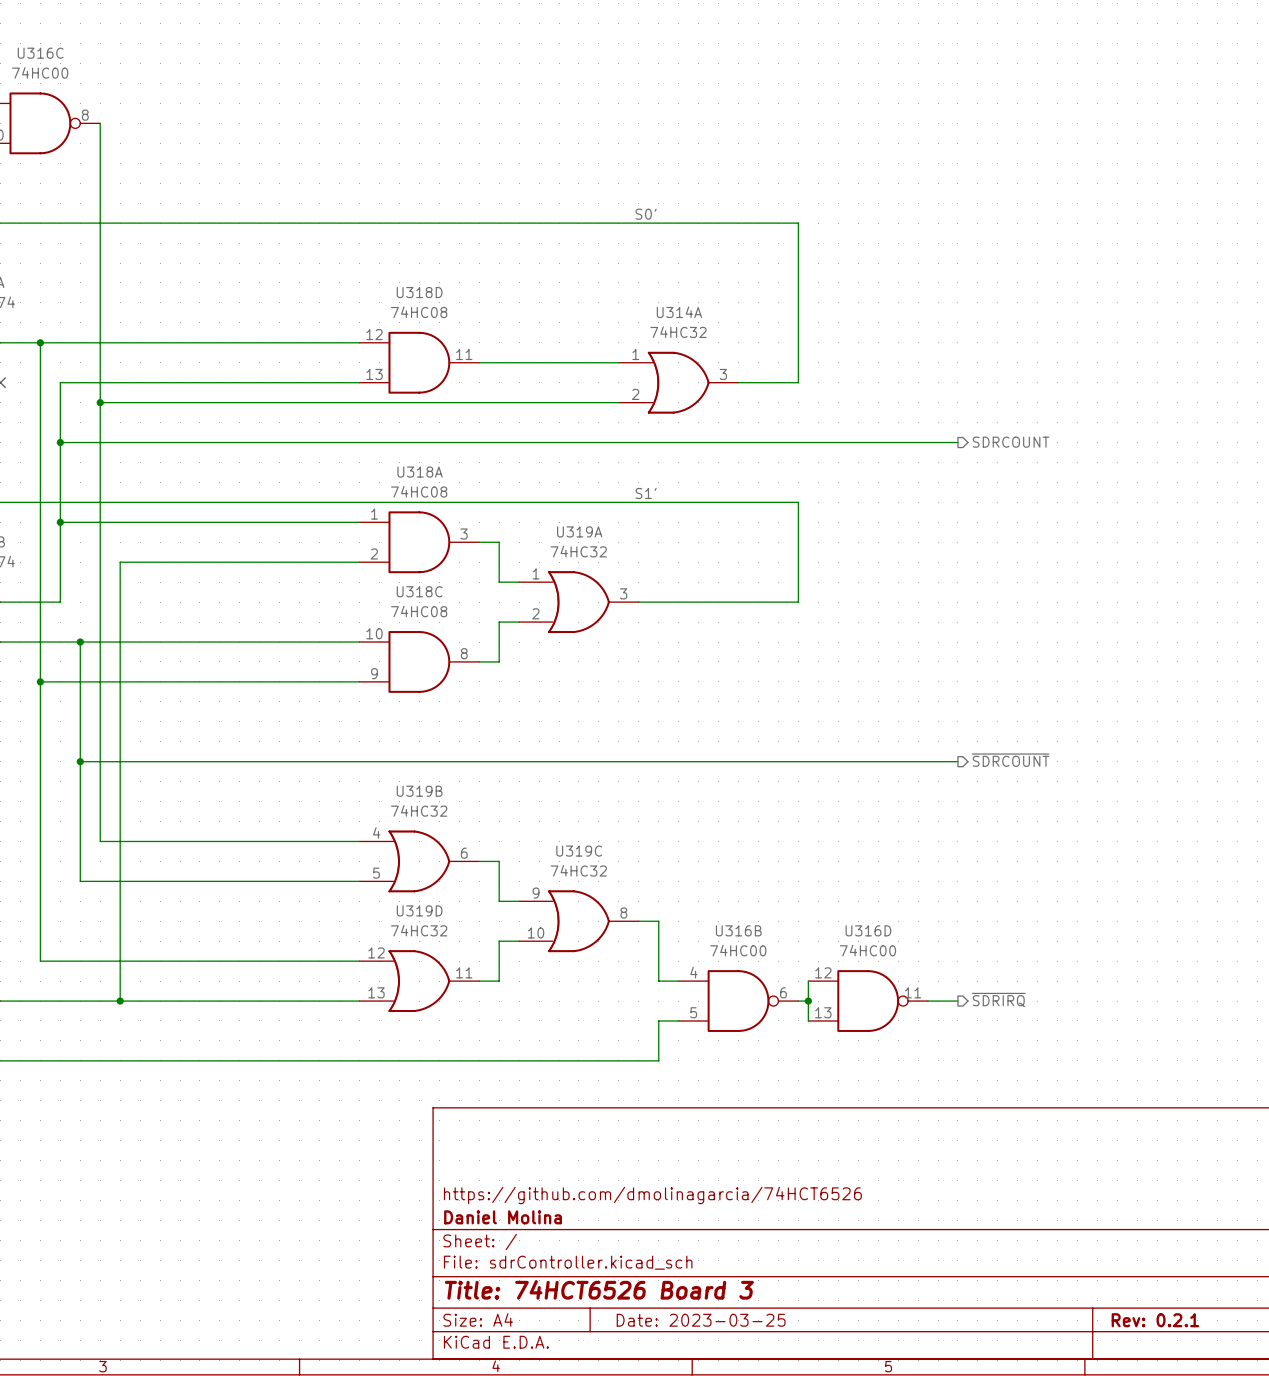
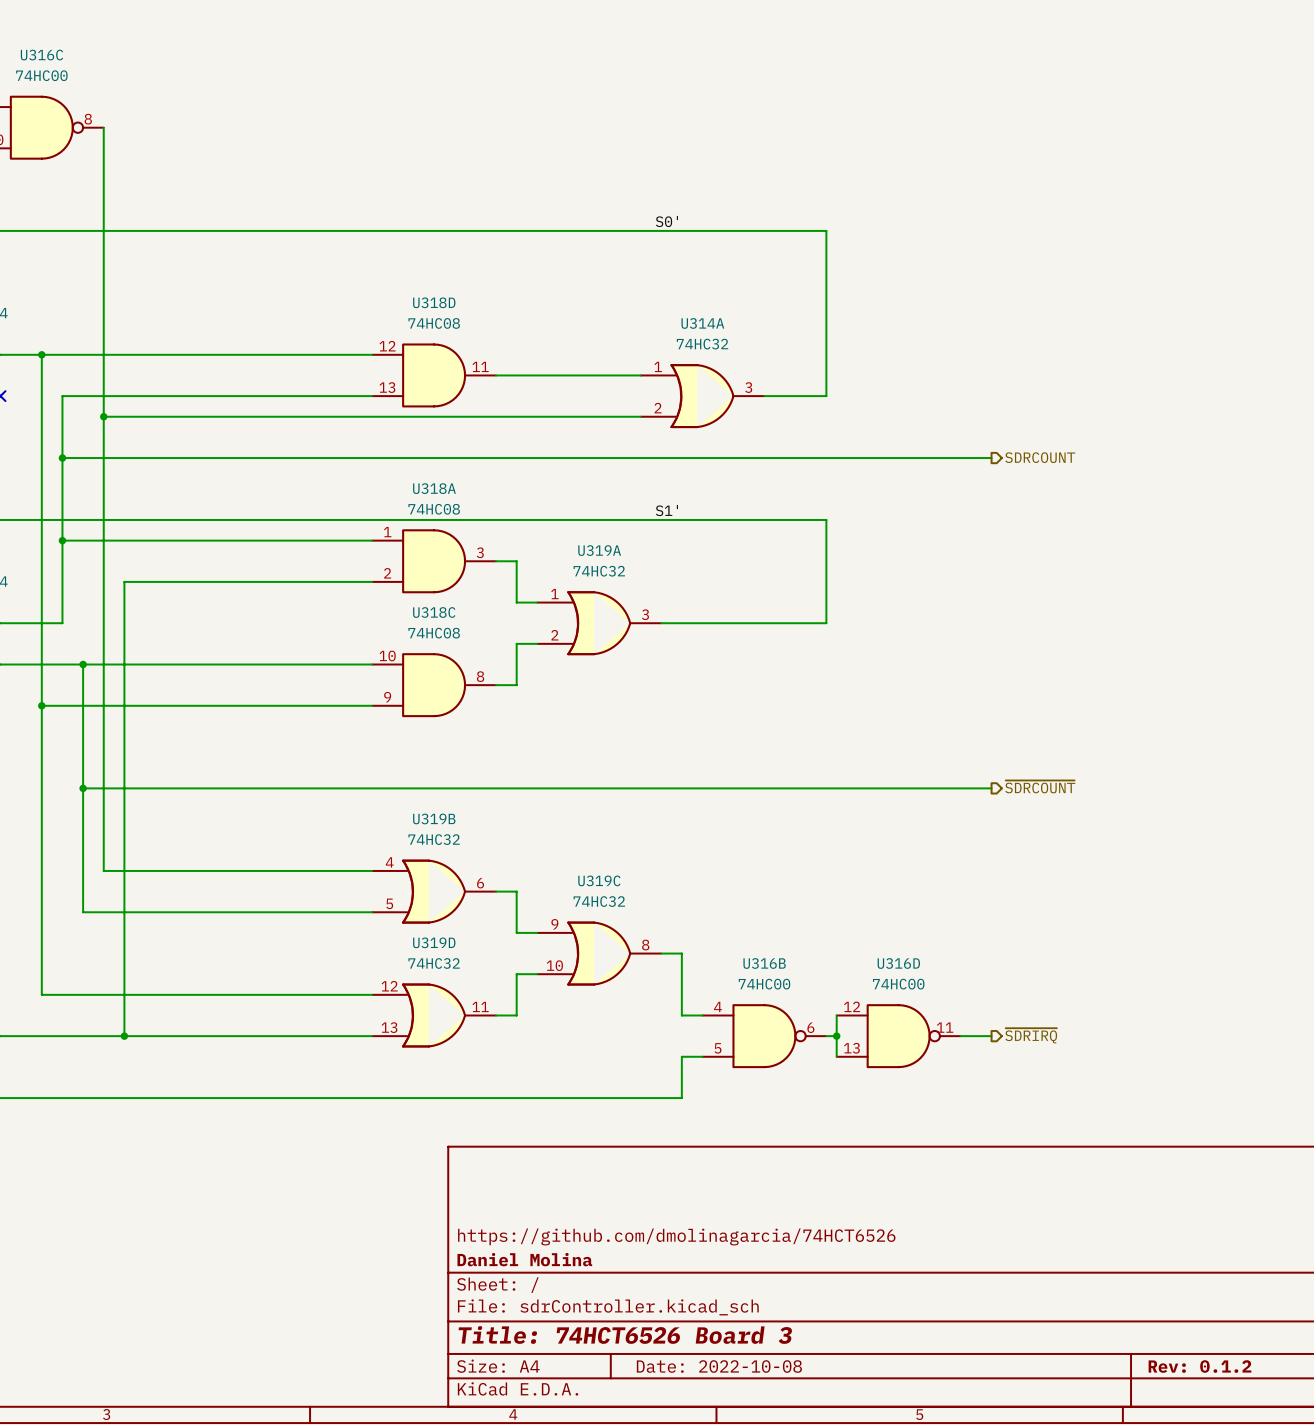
title block: Date: 2023-03-25 (701, 1320) -> Date: 2022-10-08 (719, 1366)
title block: Rev: 0.2.1 (1155, 1320) -> Rev: 0.1.2 (1199, 1366)

